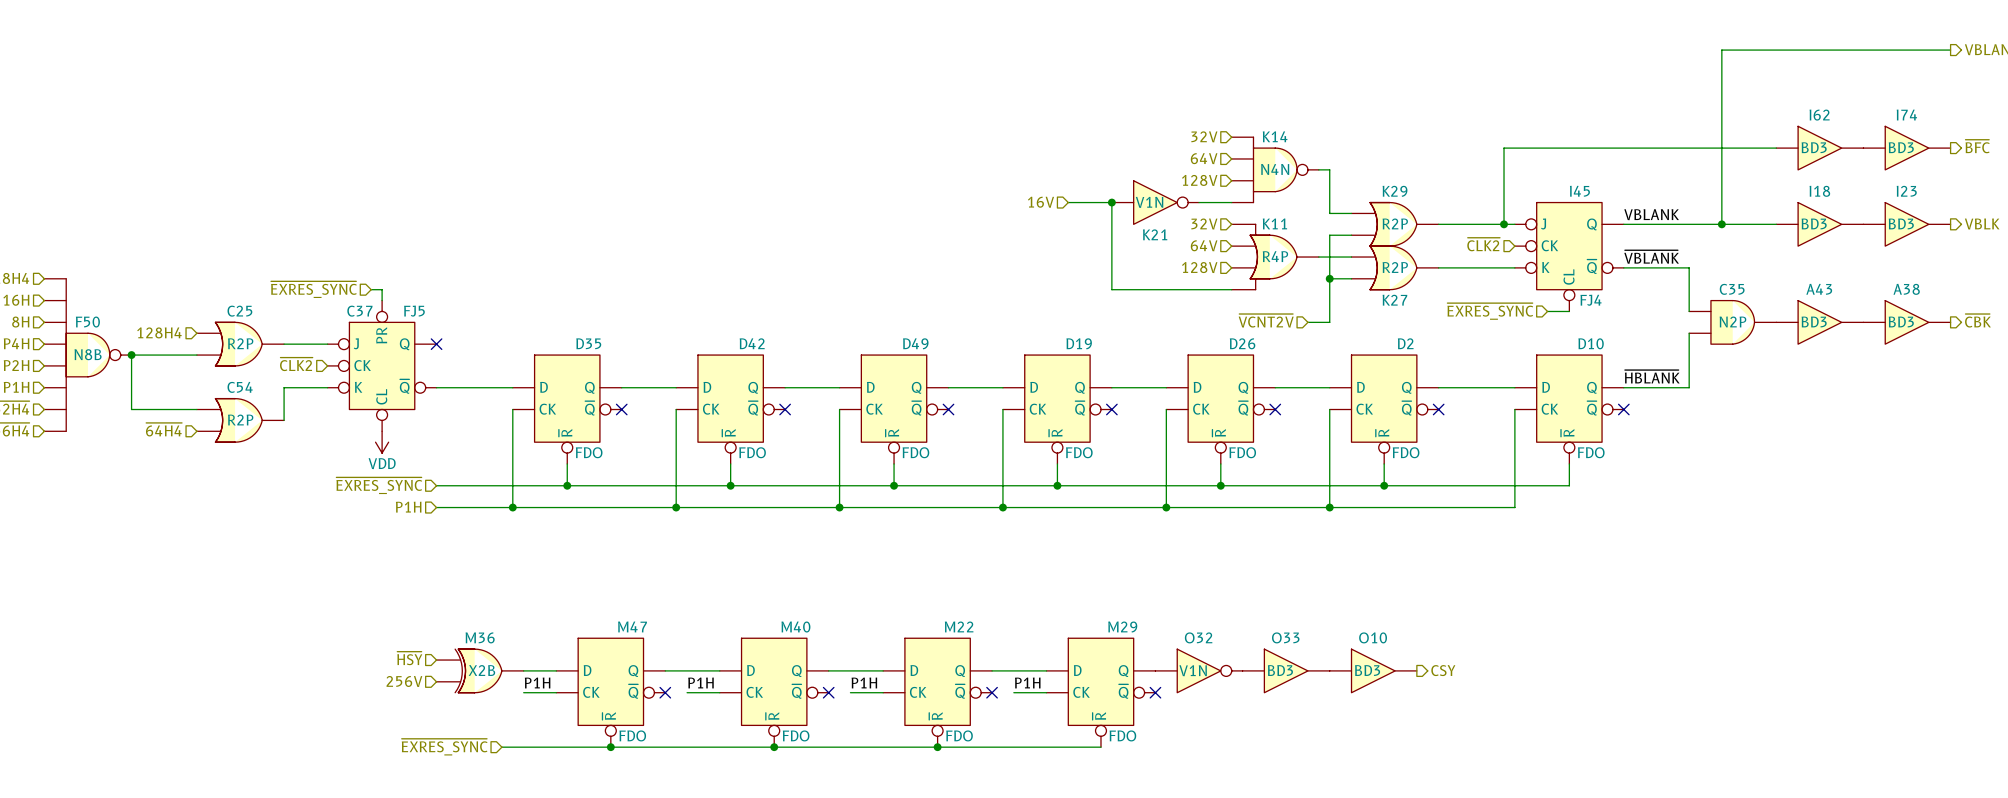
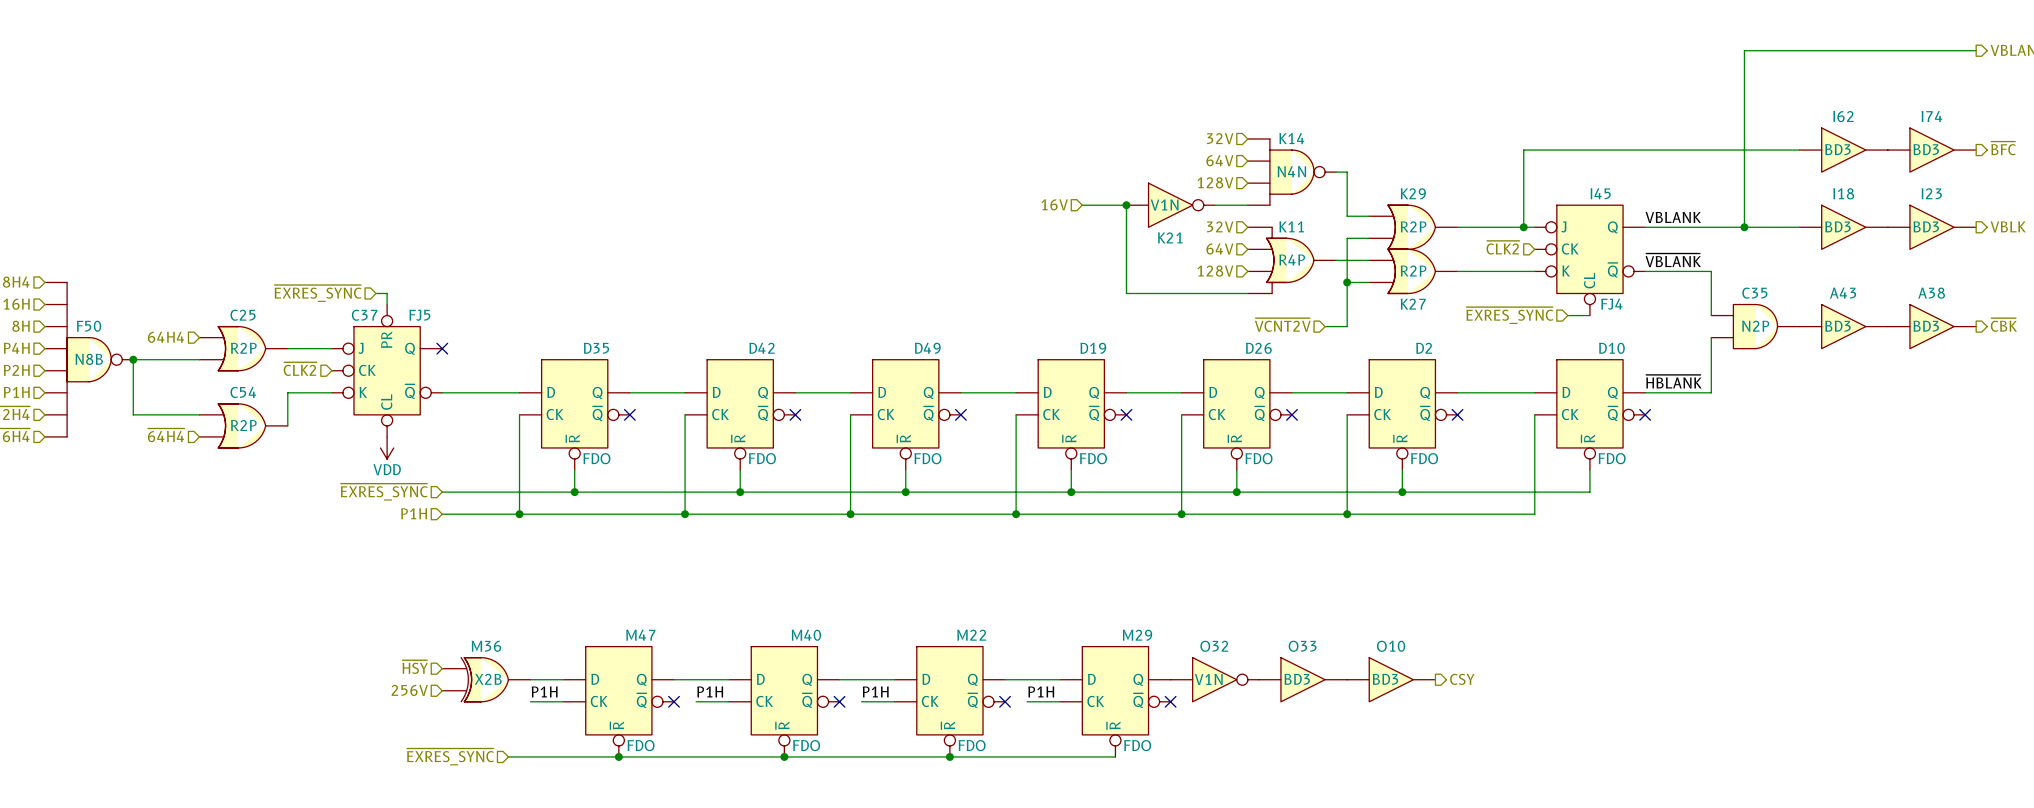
hierarchical label: 128H4 (159, 332) -> 64H4 (165, 337)

